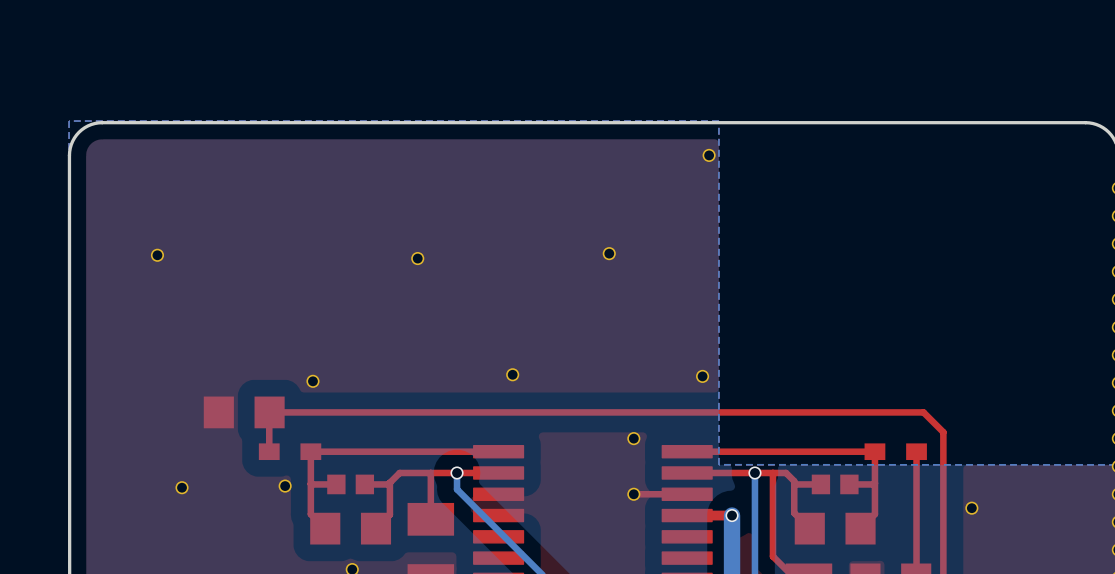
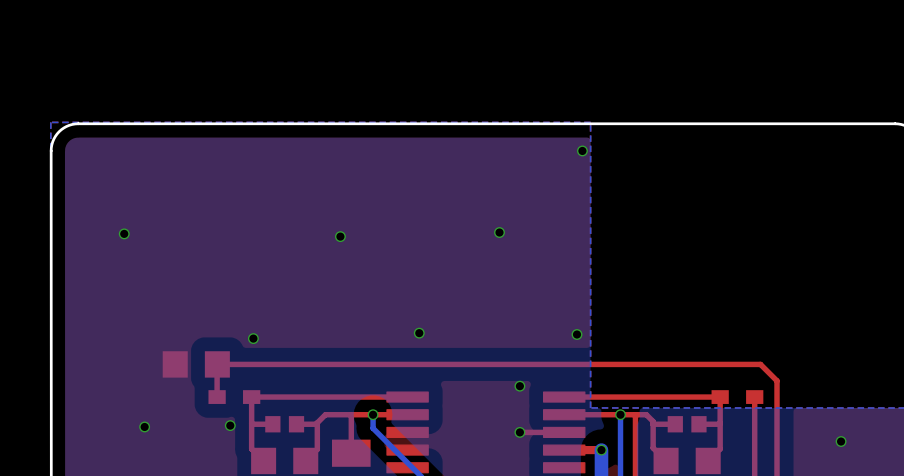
part position: (971, 508) -> (841, 441)

